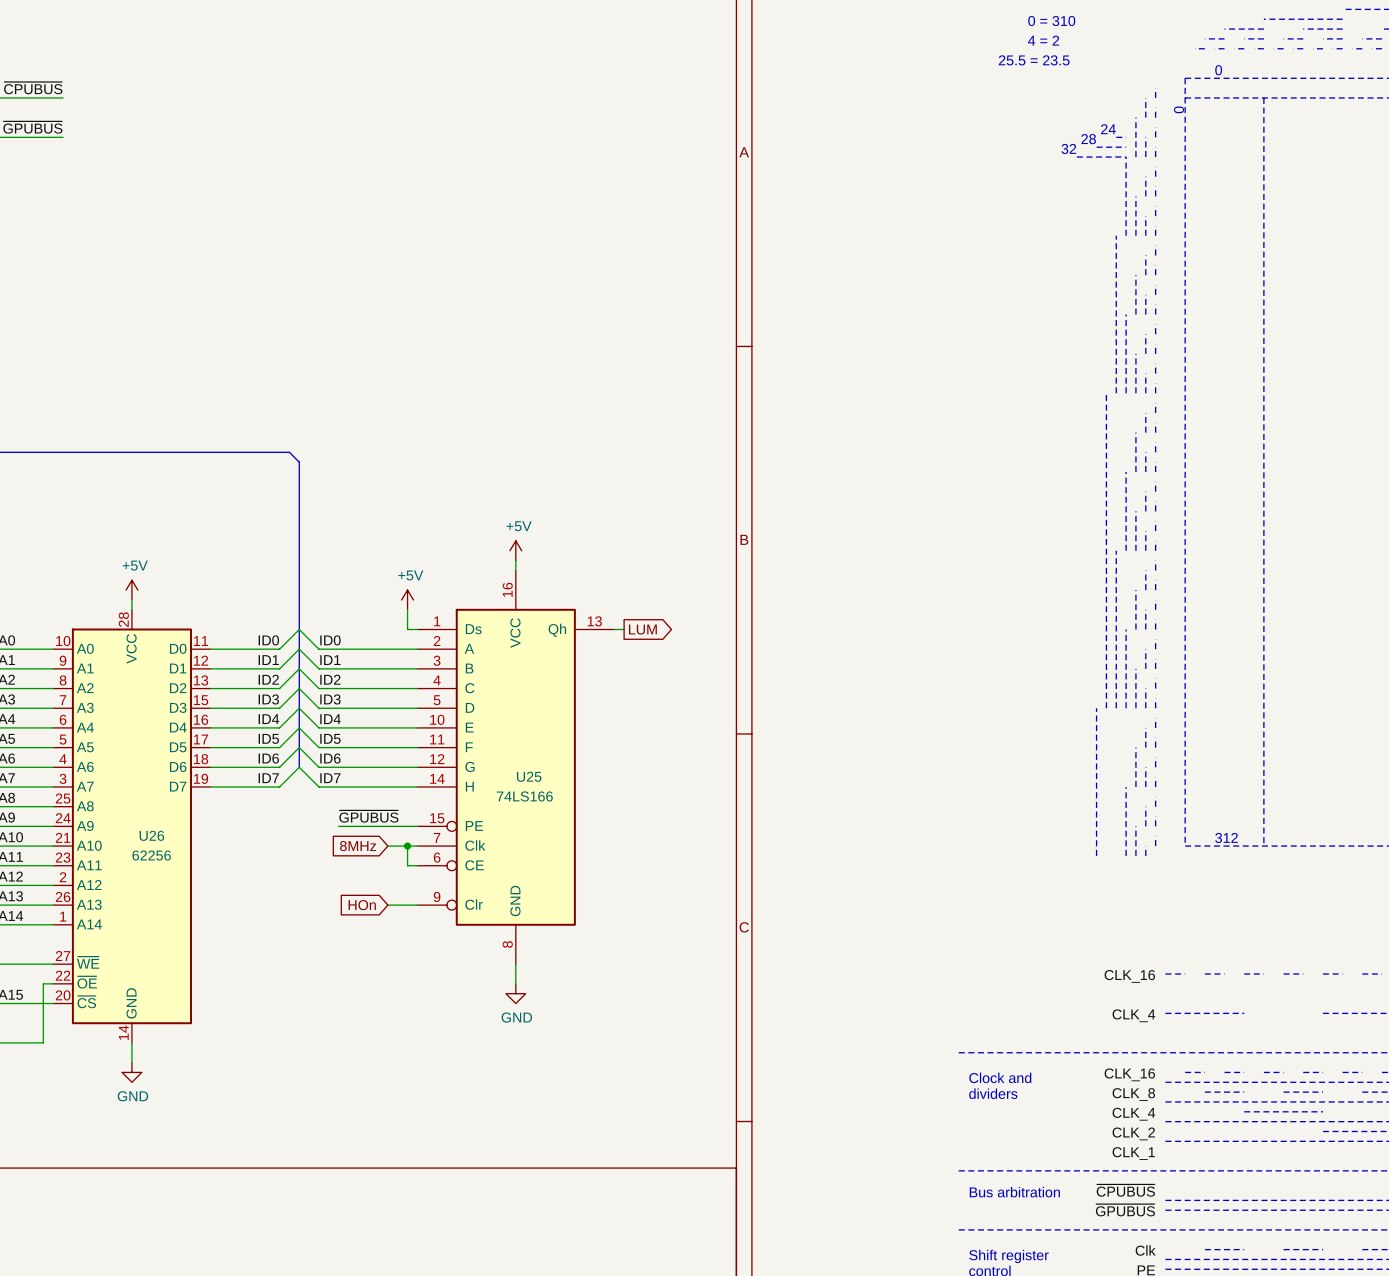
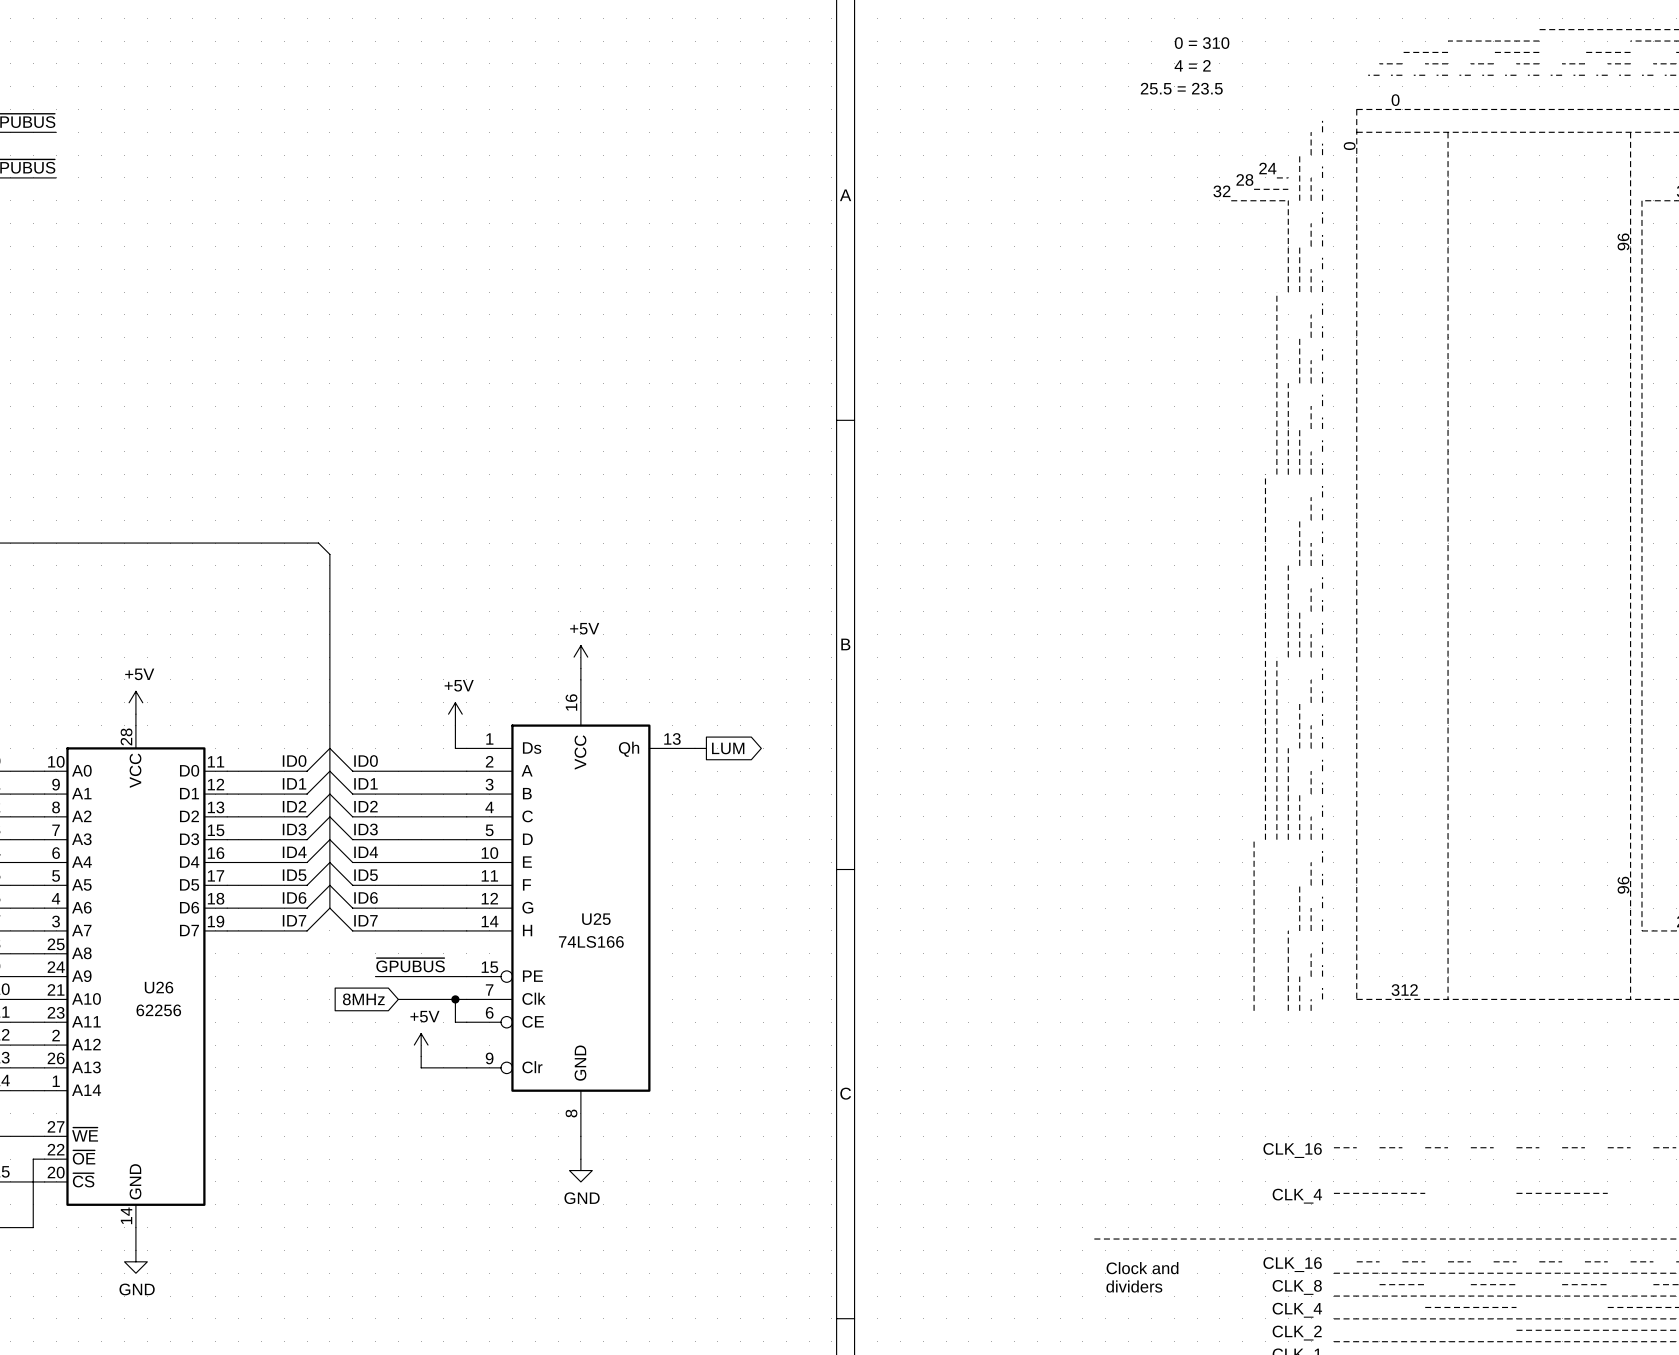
wire: none -> (398, 999) (432, 999)
global label position: 8MHz (358, 846) -> 8MHz (363, 999)
power symbol: none -> +5V (421, 1045)
wire: none -> (421, 1056) (421, 1067) (432, 1067)
global label: HOn (362, 905) -> none

